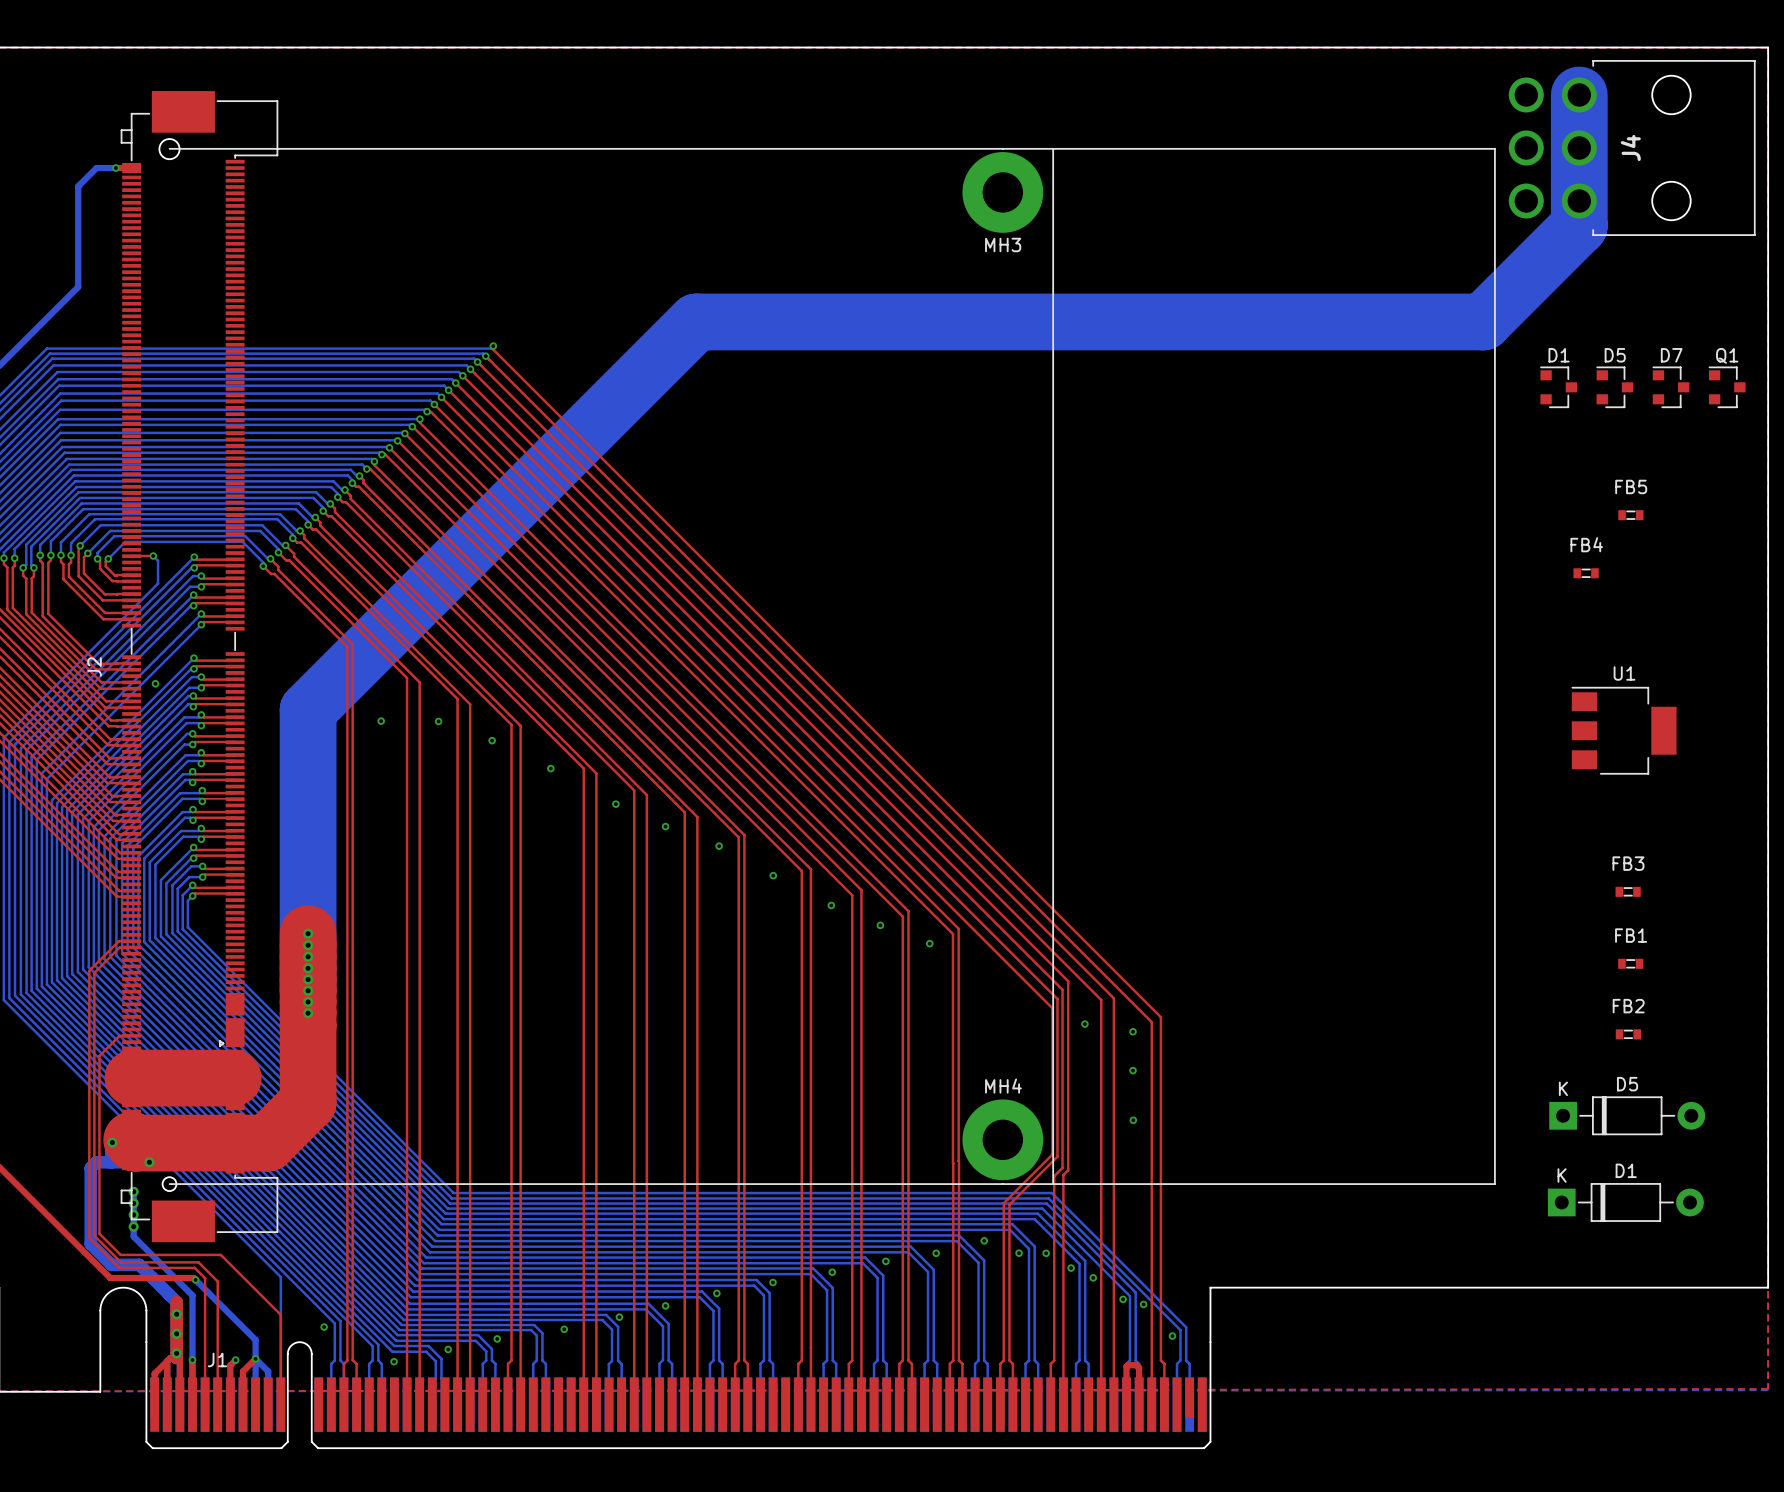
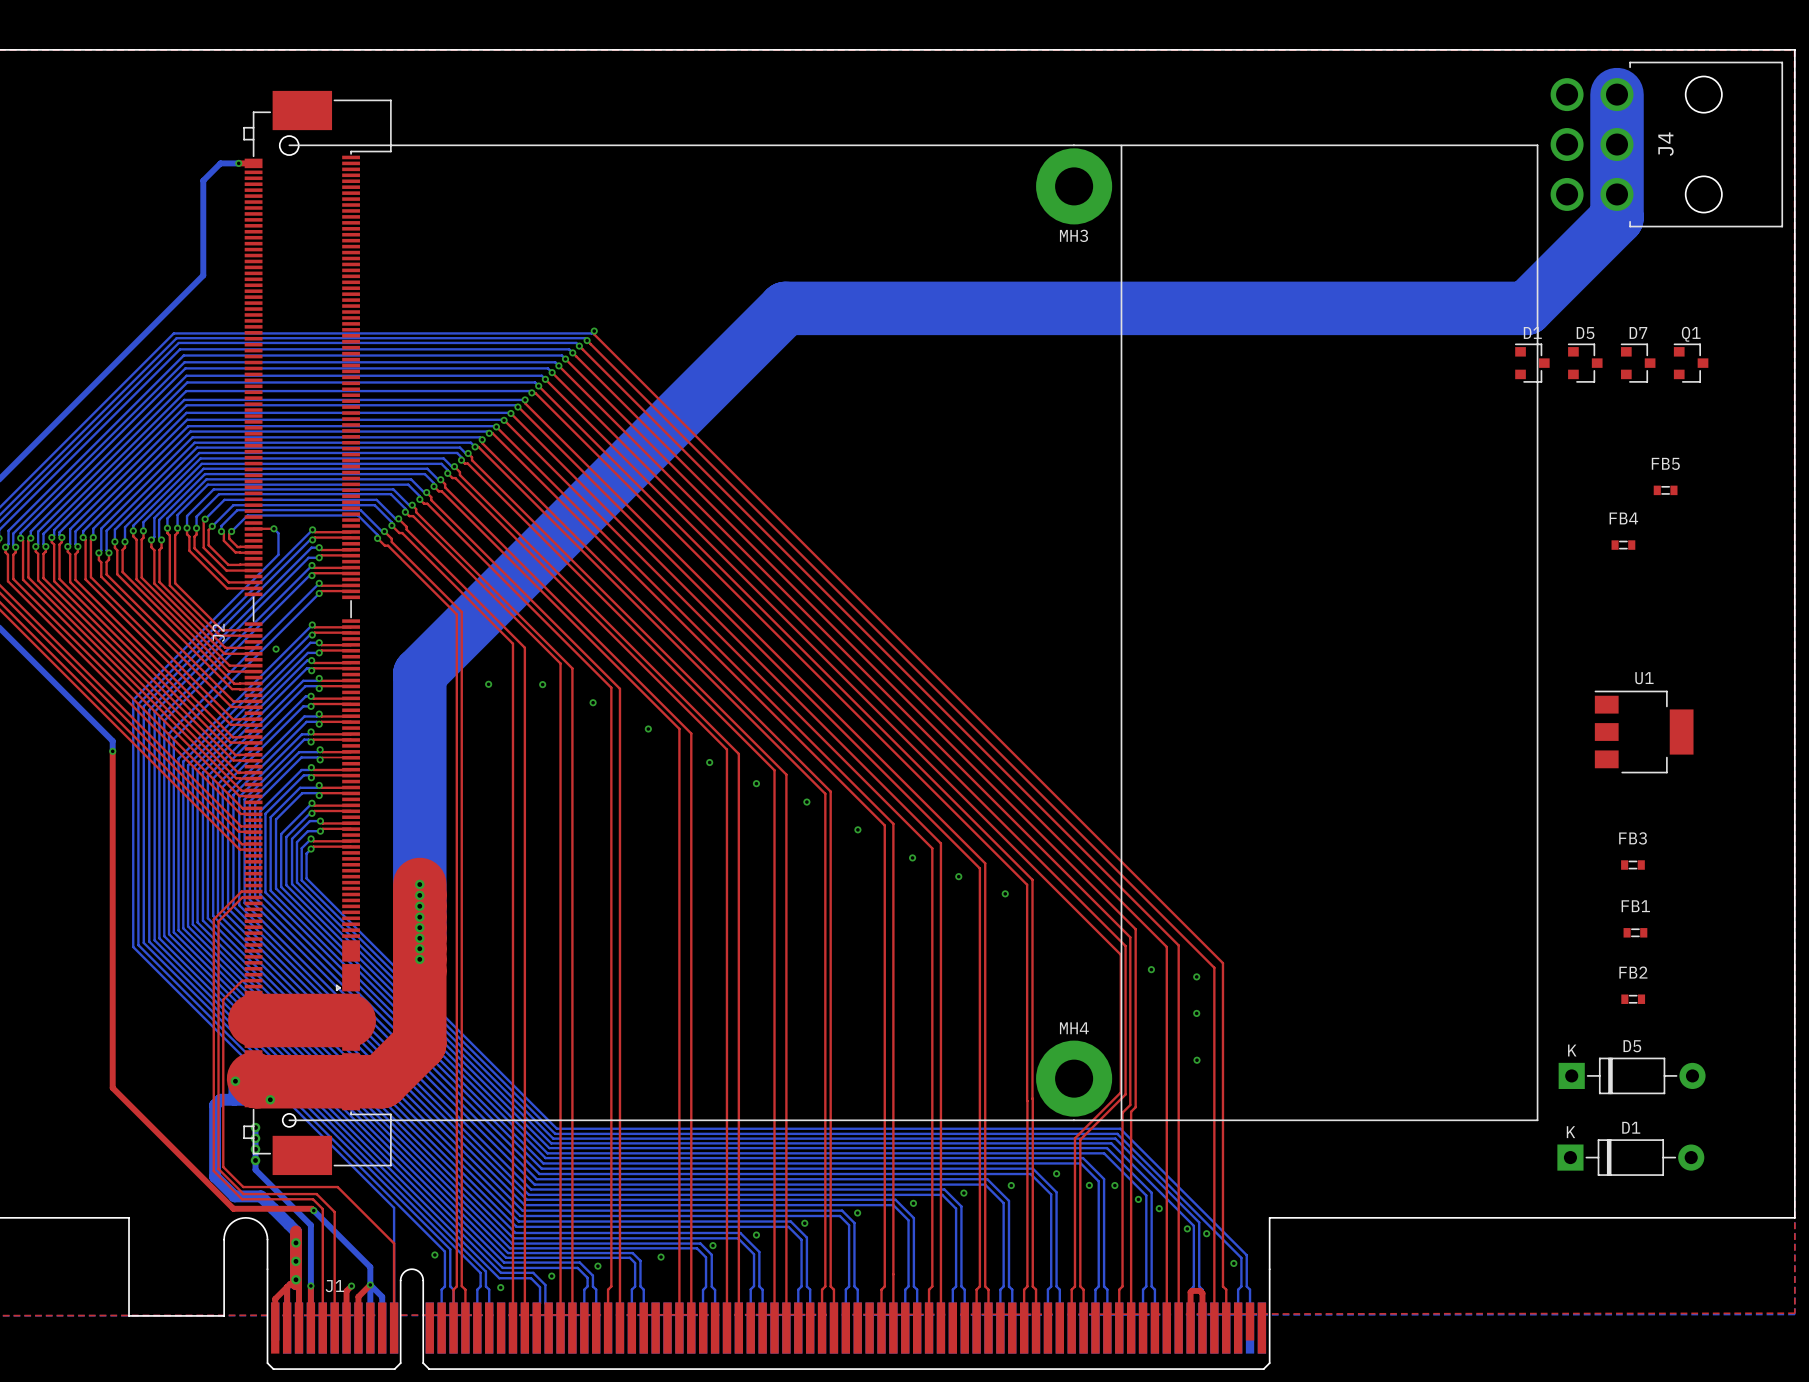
D1 position: (1558, 387) -> (1532, 363)
D5 position: (1614, 387) -> (1585, 363)
D7 position: (1671, 387) -> (1638, 363)
Q1 position: (1727, 387) -> (1691, 363)
U1 position: (1624, 730) -> (1644, 732)
FB3 position: (1628, 891) -> (1632, 865)
FB1 position: (1630, 963) -> (1635, 932)
FB2 position: (1628, 1034) -> (1633, 999)
D5 position: (1627, 1115) -> (1632, 1075)
D1 position: (1625, 1202) -> (1630, 1157)

